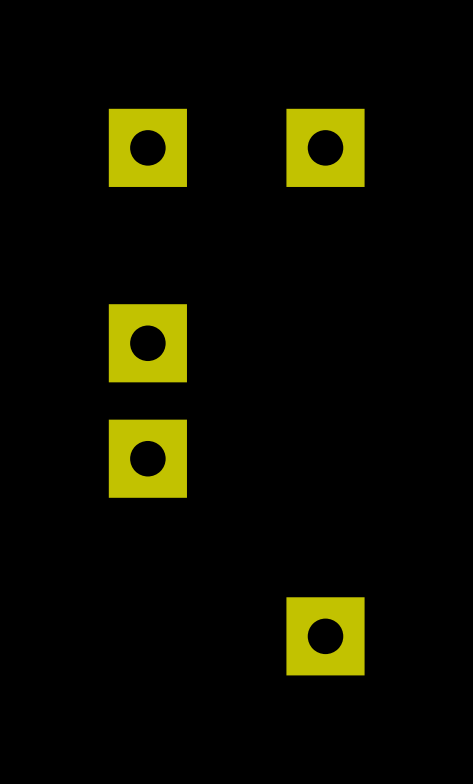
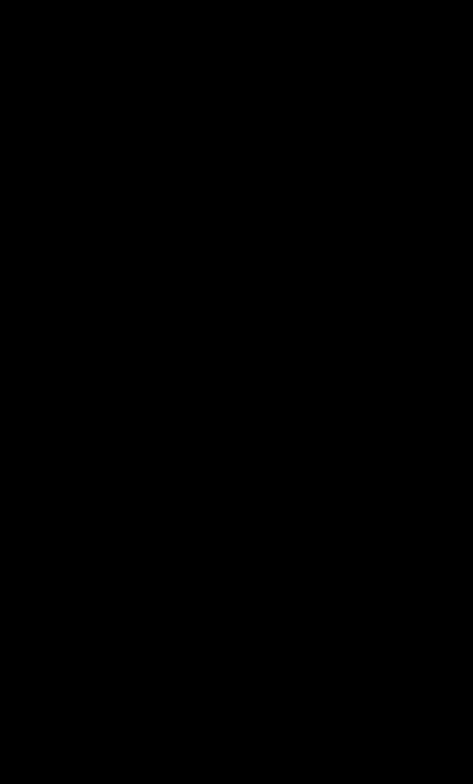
part: (147, 147) -> none
part: (325, 147) -> none
part: (147, 343) -> none
part: (147, 458) -> none
part: (325, 636) -> none

